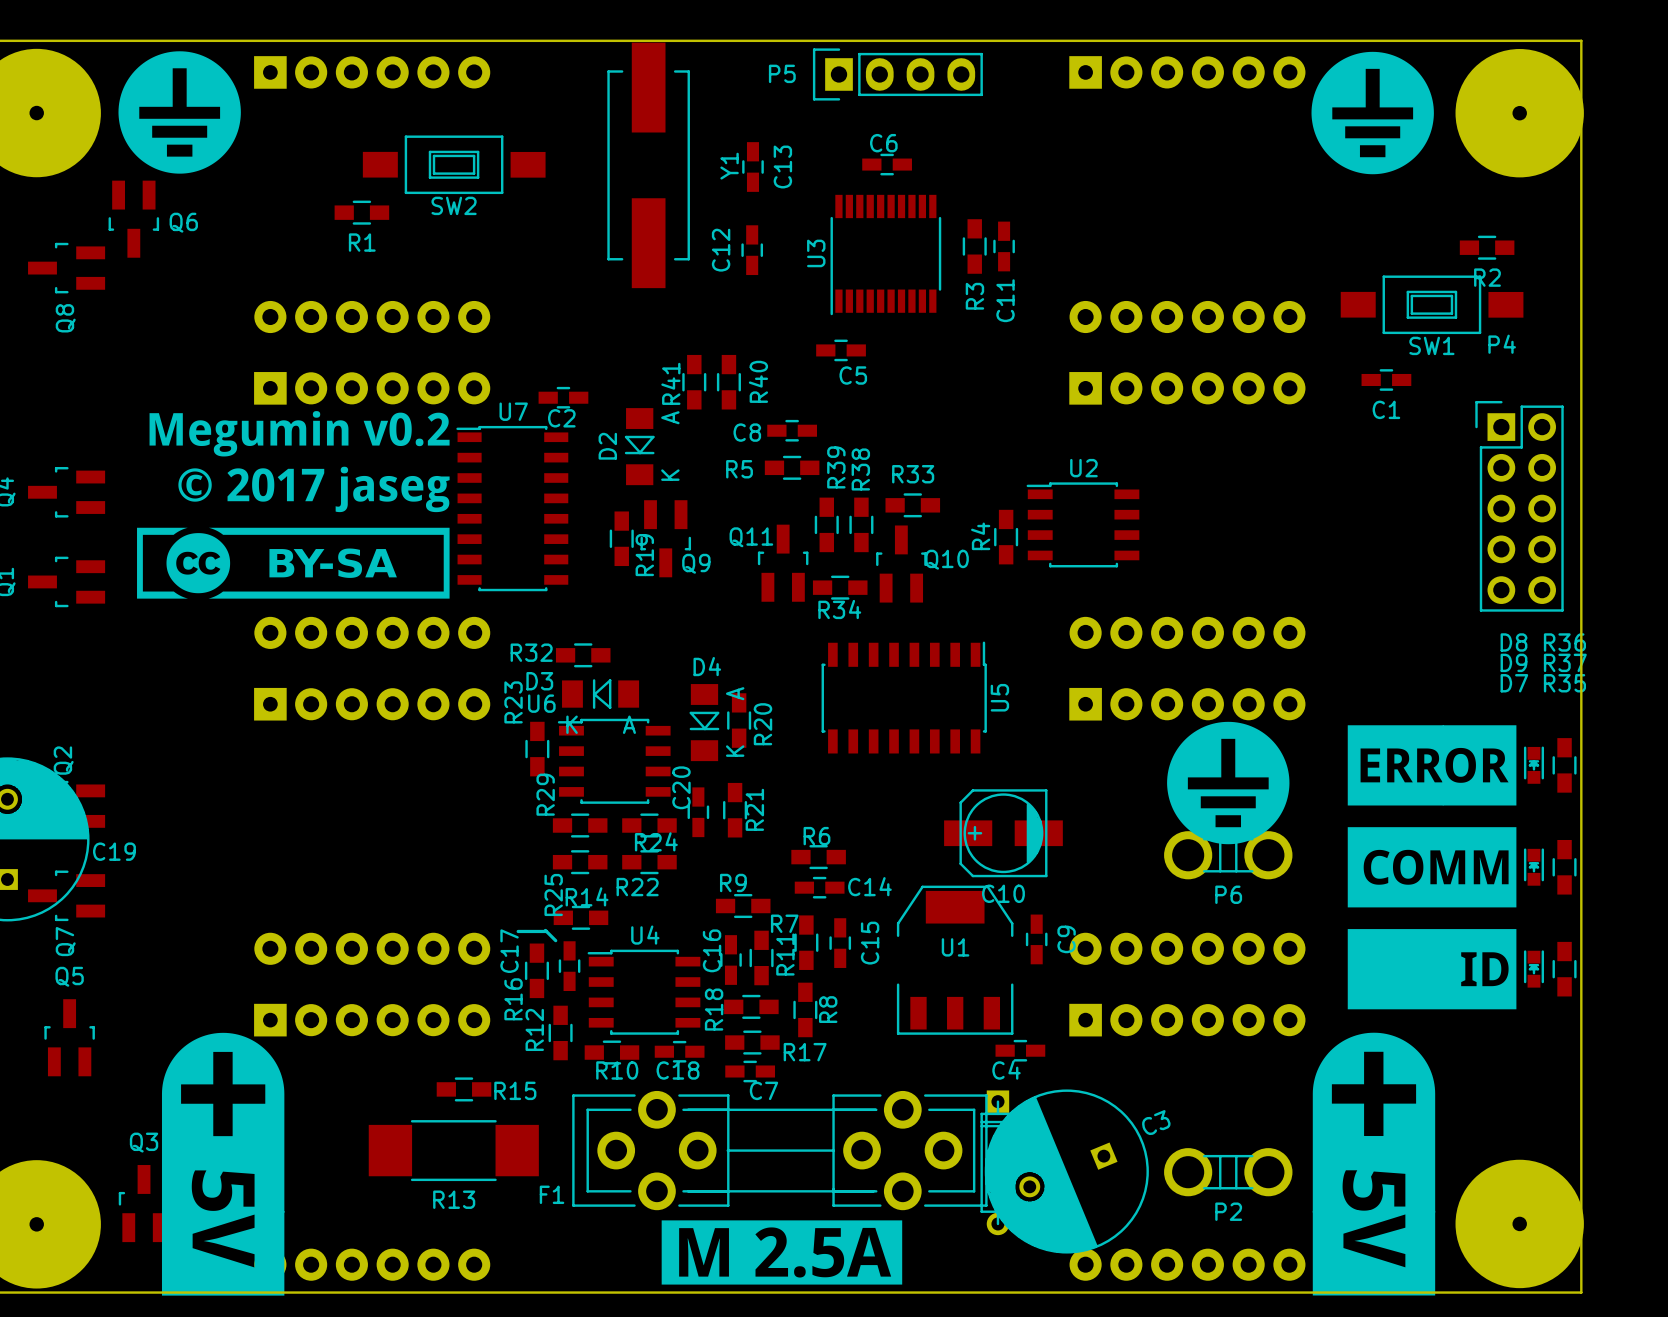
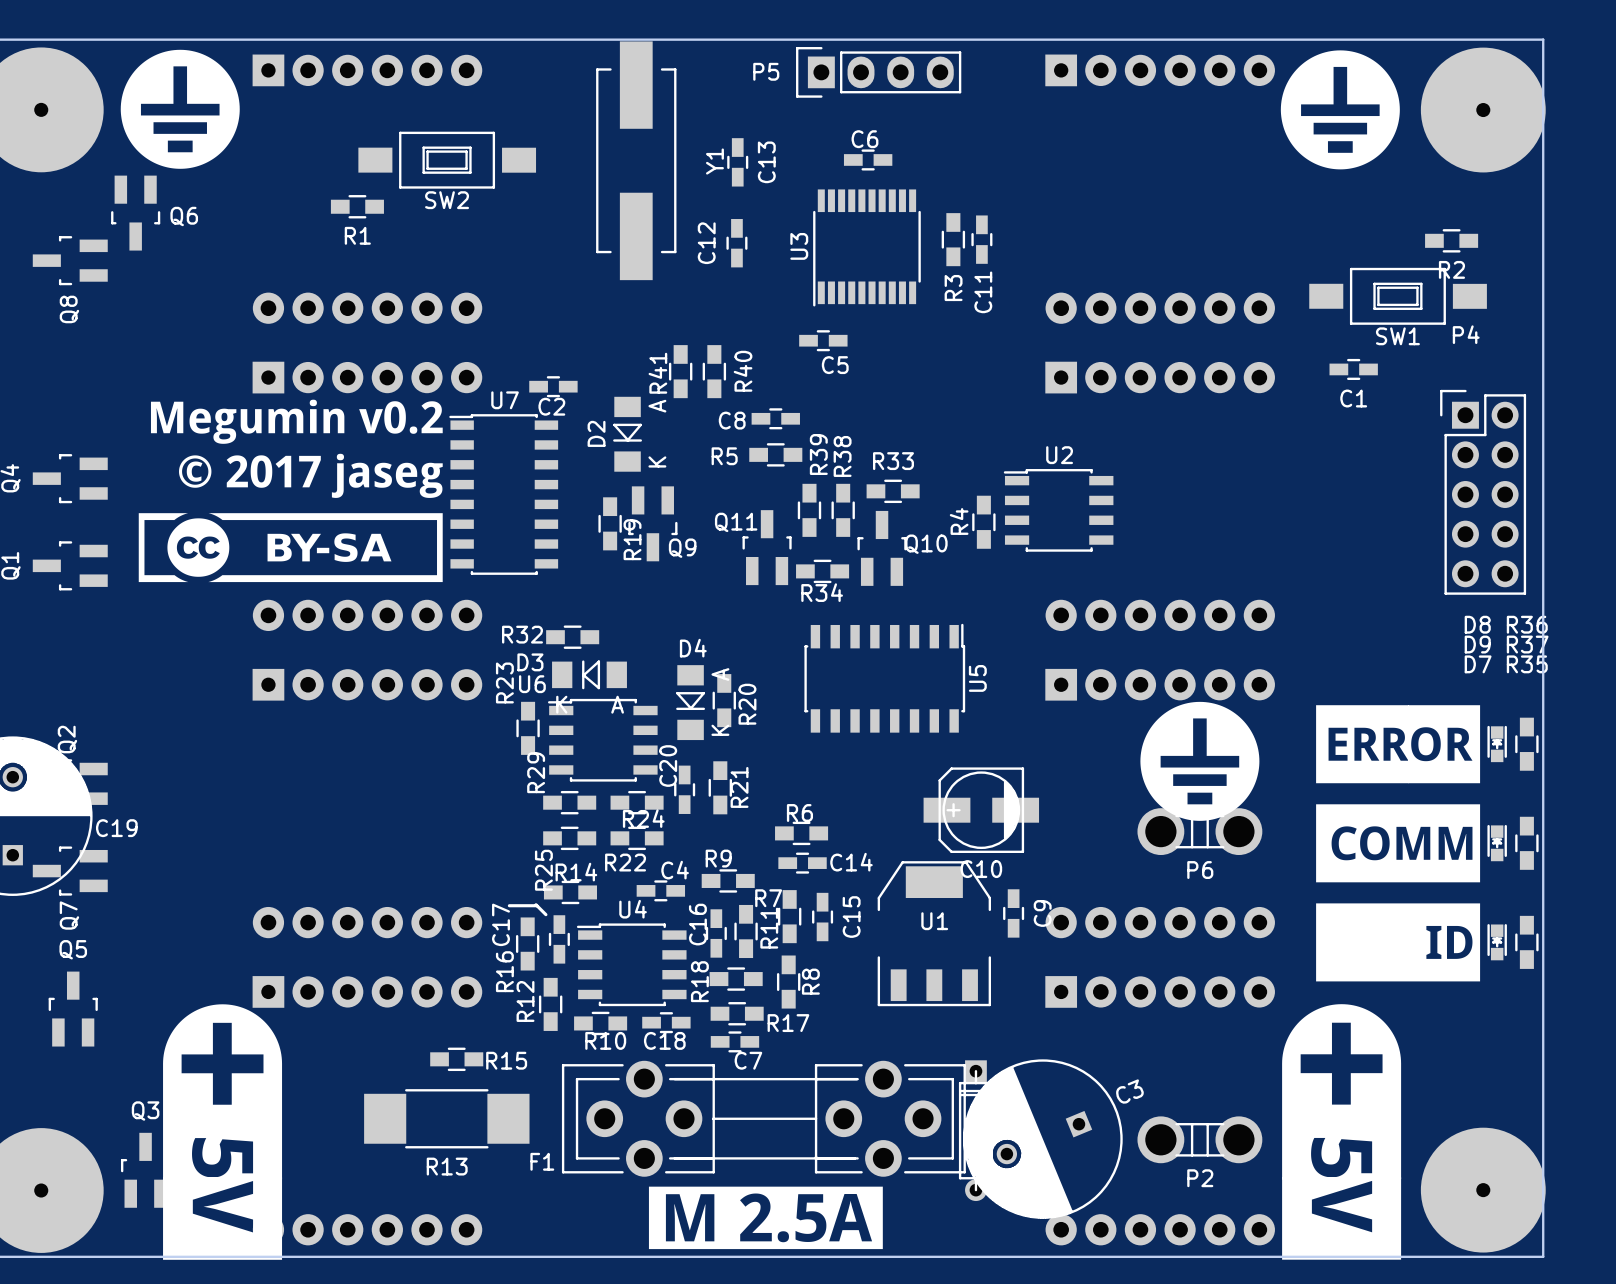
C4 position: (1020, 1050) -> (660, 890)
C4 name position: C4 (1006, 1070) -> C4 (675, 870)

